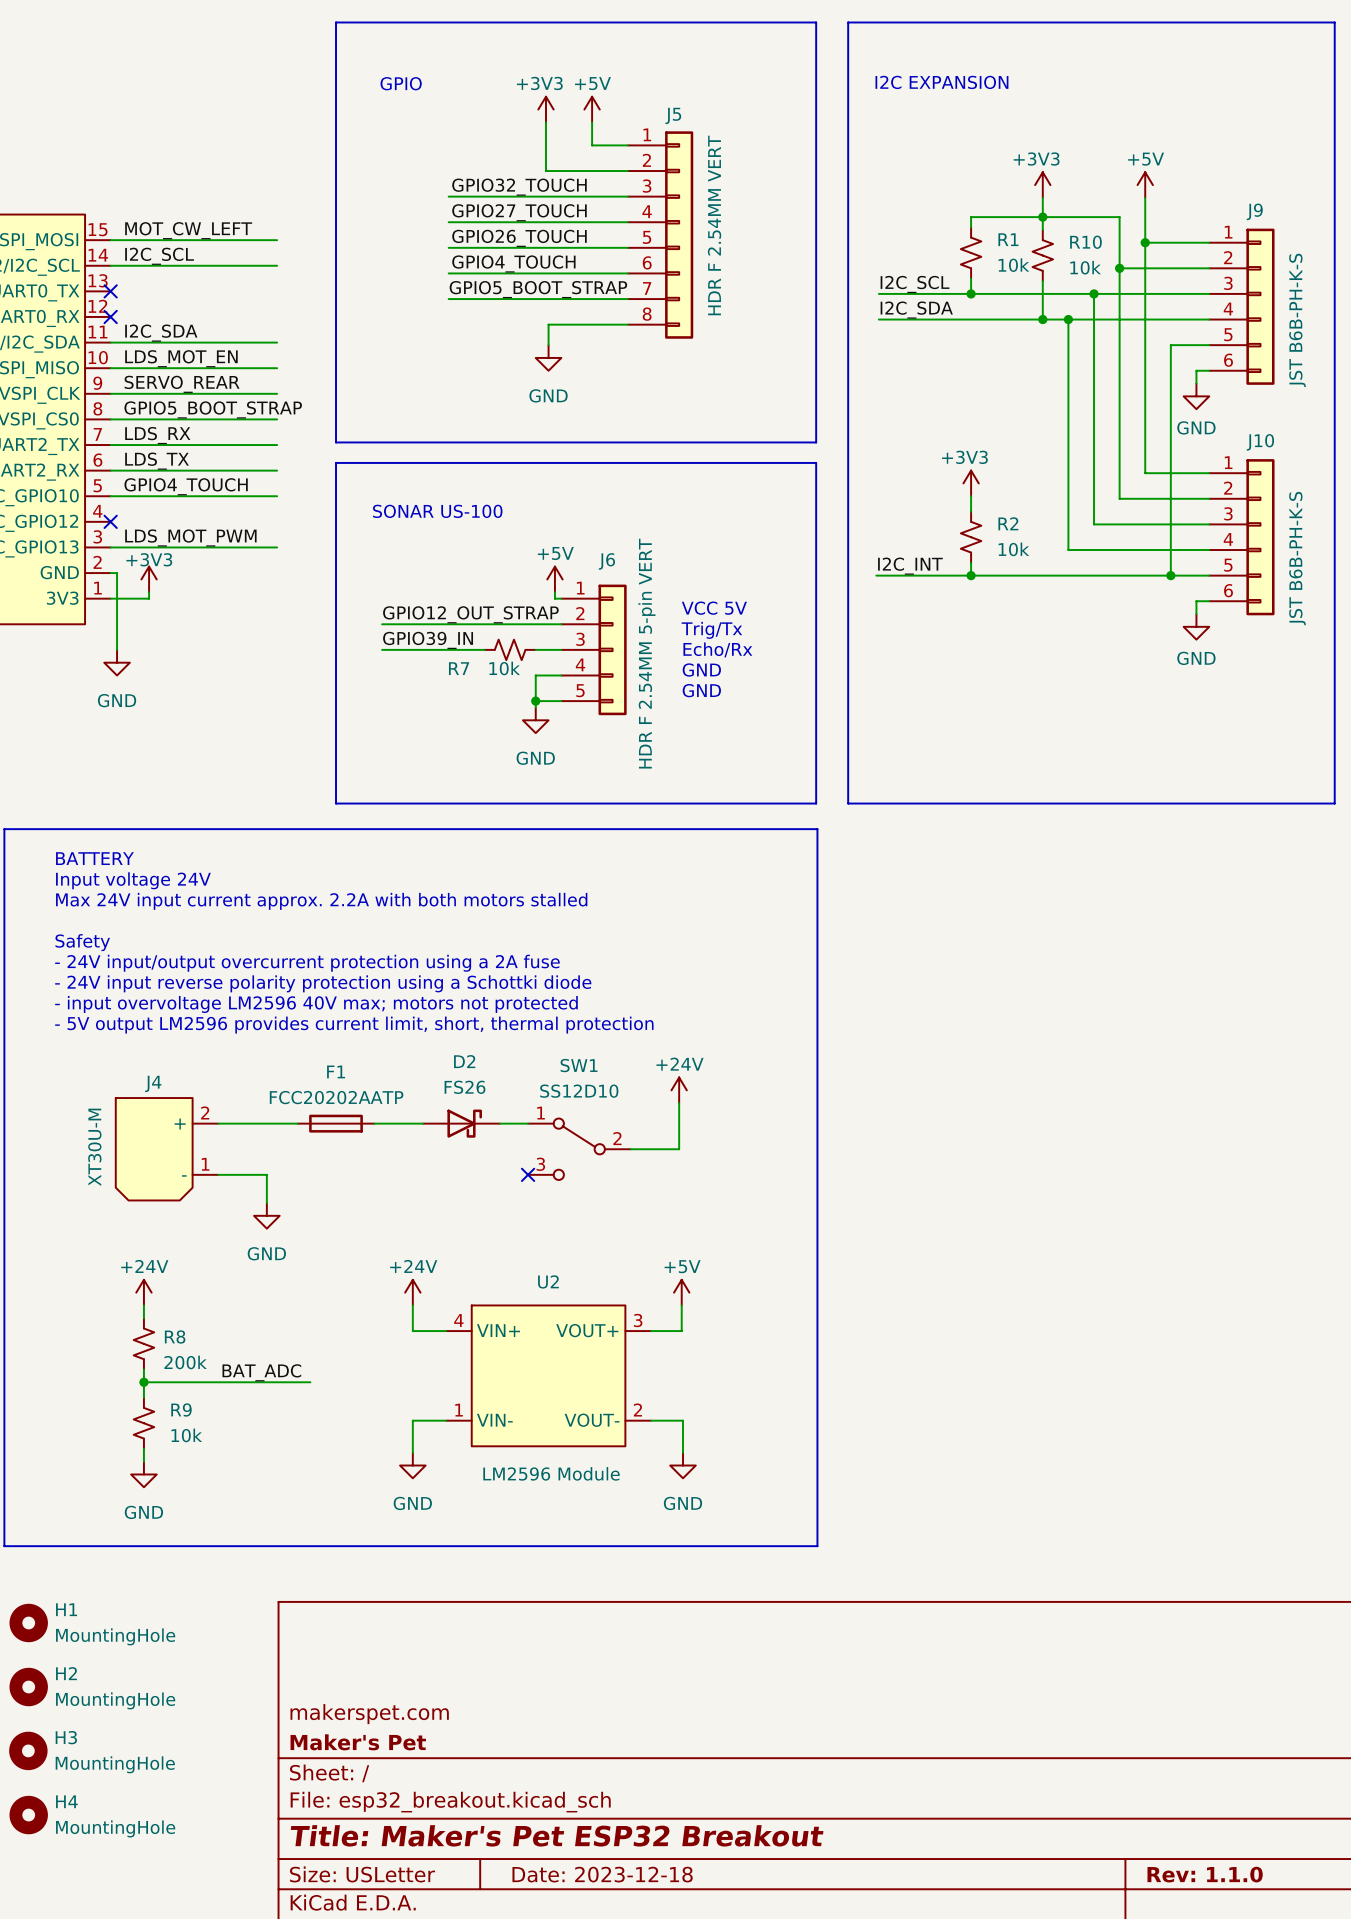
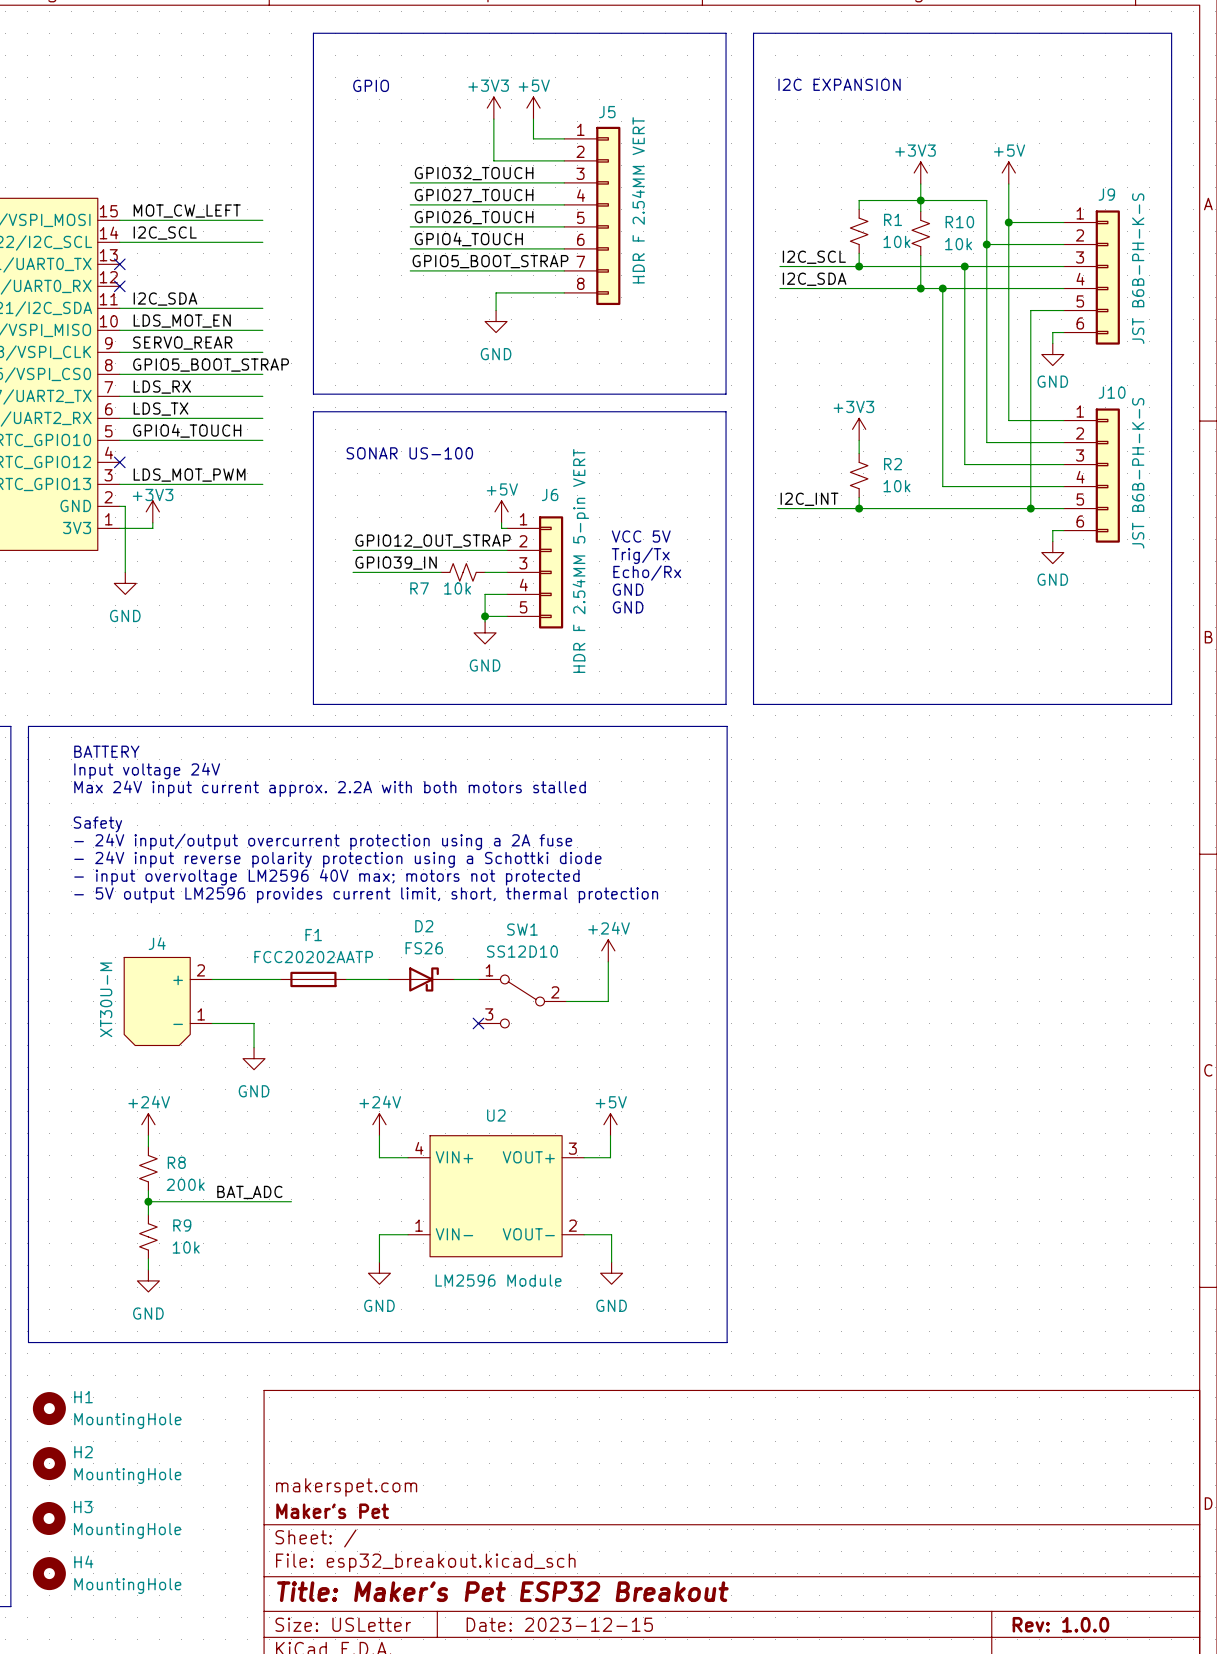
title block: Date: 2023-12-18 (602, 1874) -> Date: 2023-12-15 (559, 1624)
title block: Rev: 1.1.0 (1205, 1874) -> Rev: 1.0.0 (1060, 1624)

